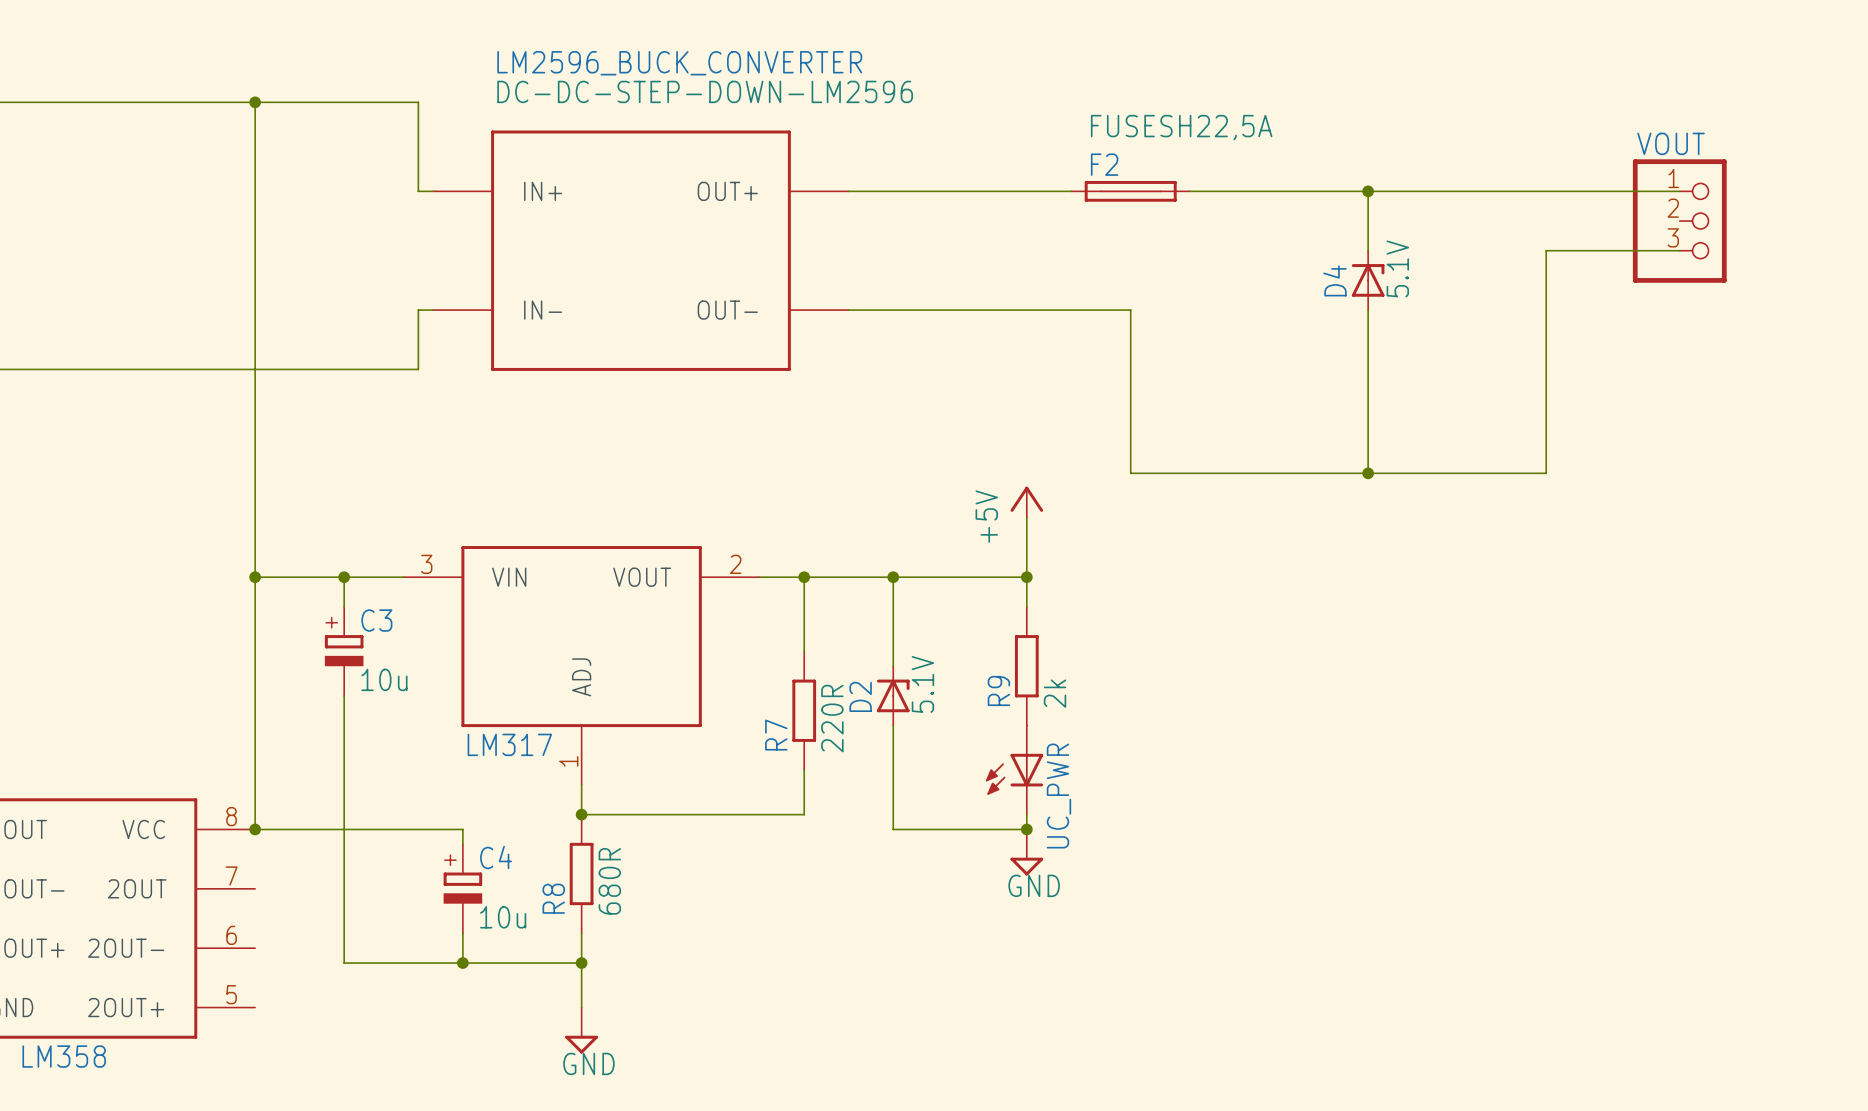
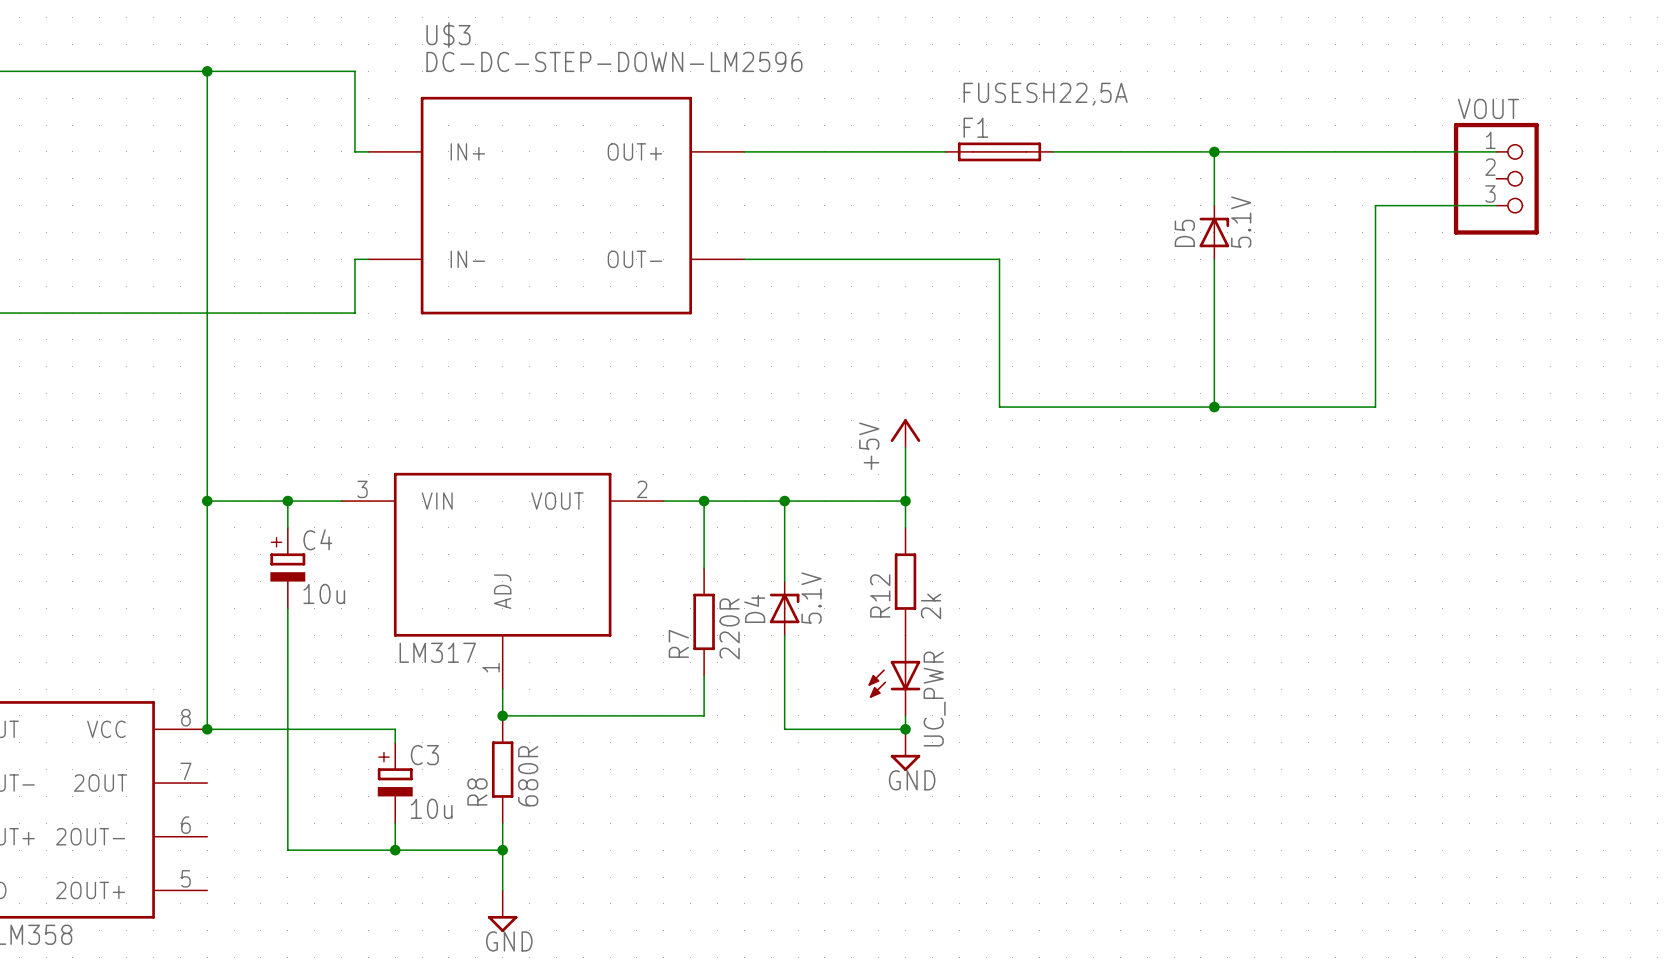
LM2596_BUCK_CONVERTER name: LM2596_BUCK_CONVERTER (679, 63) -> U$3 (448, 35)
F2 name: F2 (1104, 164) -> F1 (975, 127)
D4 name: D4 (1334, 280) -> D5 (1184, 233)
C3 name: C3 (376, 620) -> C4 (317, 539)
R9 name: R9 (998, 690) -> R12 (880, 595)
D2 name: D2 (860, 696) -> D4 (754, 608)
C4 name: C4 (496, 857) -> C3 (424, 755)

